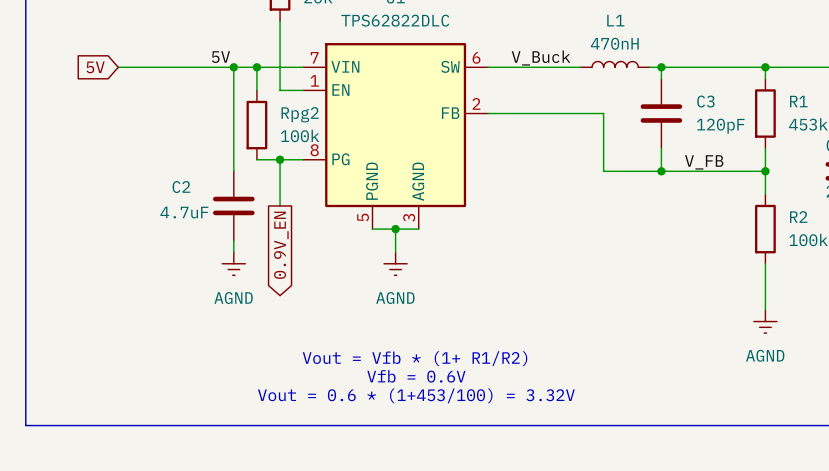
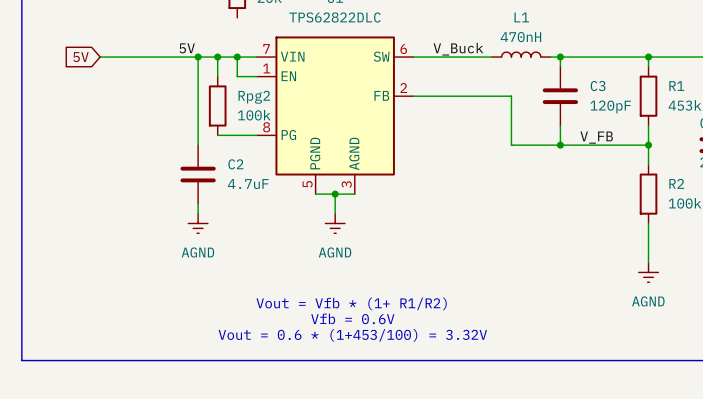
wire: (280, 21) (280, 67) -> none
junction: none -> (237, 57)
wire: (280, 159) (280, 205) -> none
junction: (280, 159) -> none
C2 name position: C2 (181, 187) -> C2 (235, 164)
C2 value position: 4.7uF (184, 212) -> 4.7uF (248, 184)
global label: 0.9V_EN (281, 245) -> none

